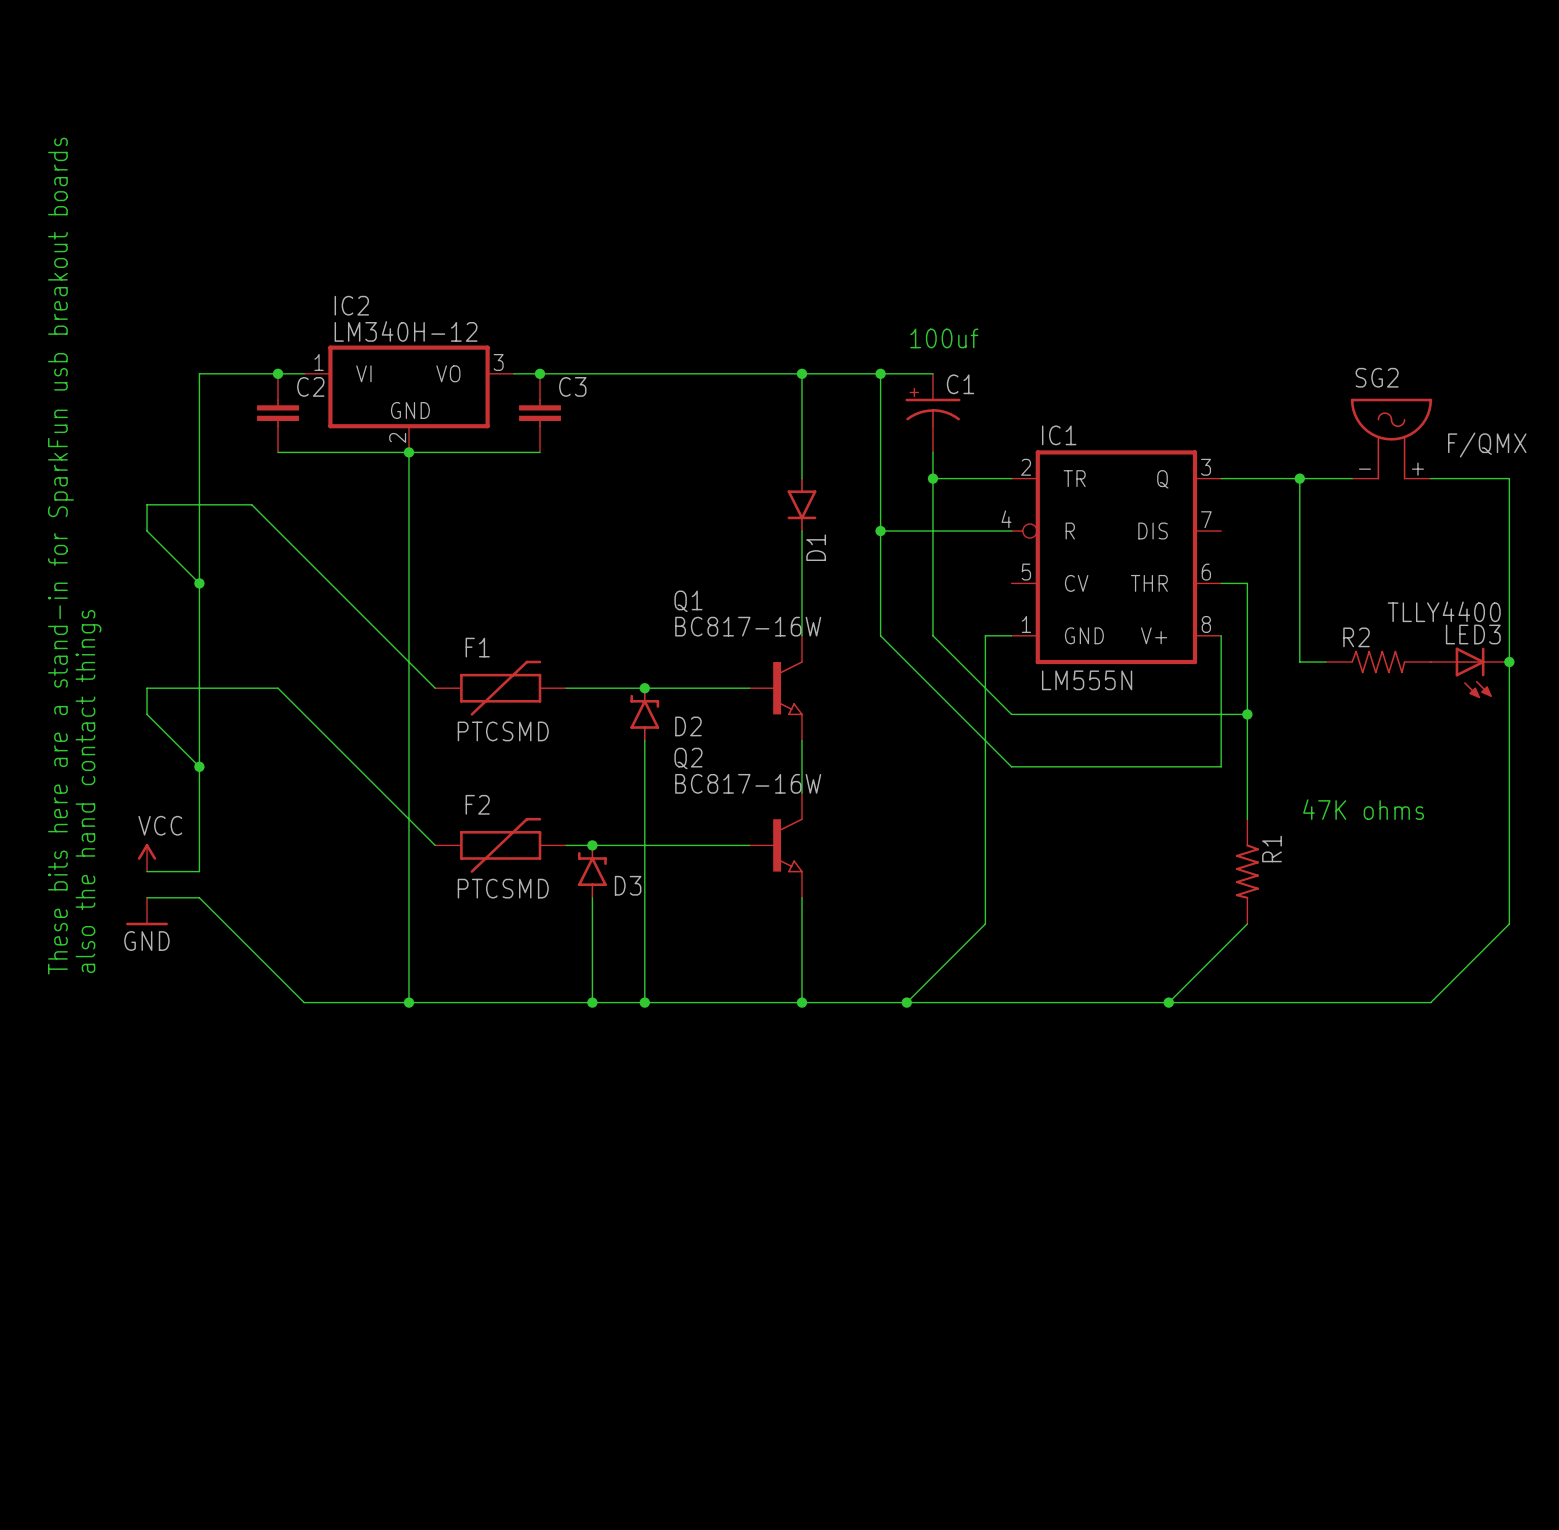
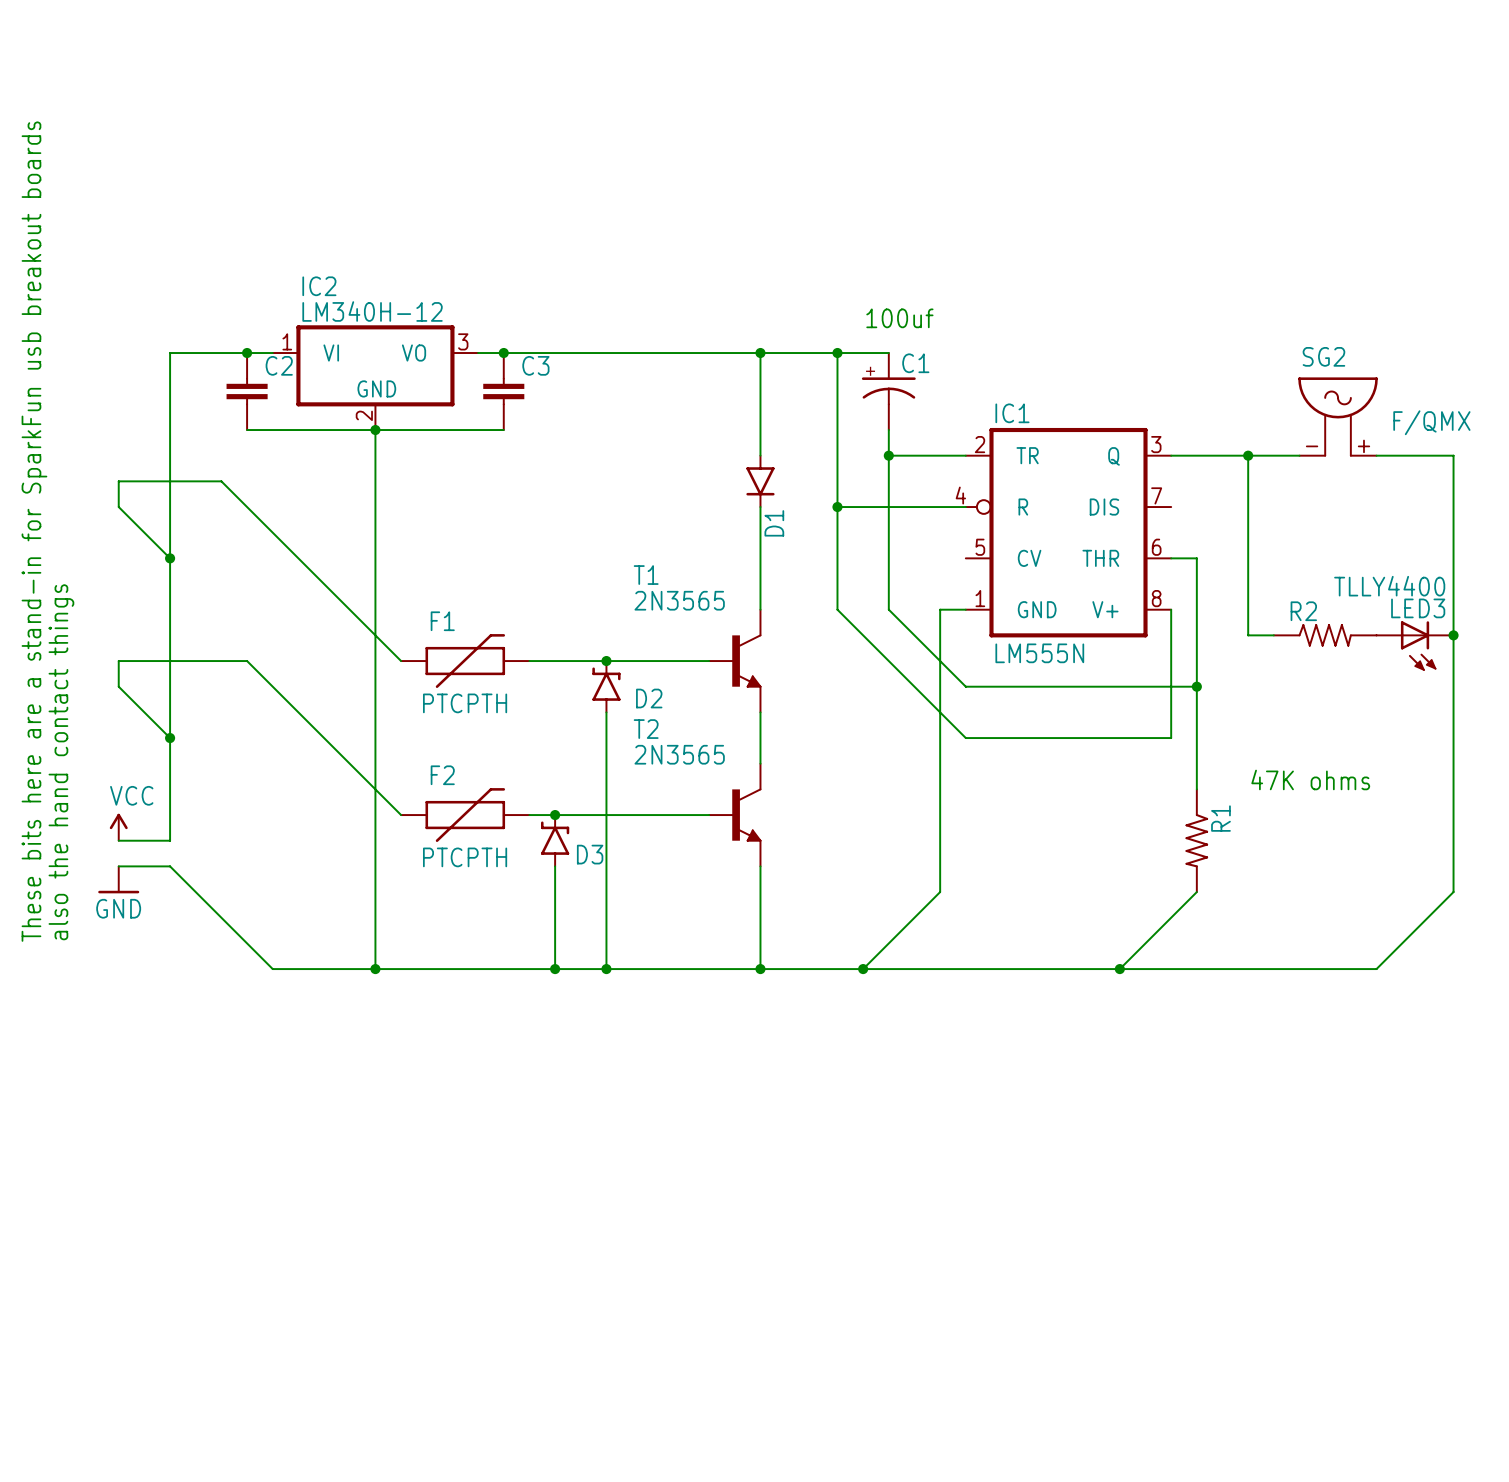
Q1: BC817-16W (776, 688) -> none
T1: none -> 2N3565 (735, 661)
F1 value: PTCSMD (503, 731) -> PTCPTH (465, 703)
Q2: BC817-16W (776, 845) -> none
T2: none -> 2N3565 (735, 815)
F2 value: PTCSMD (503, 888) -> PTCPTH (465, 857)

